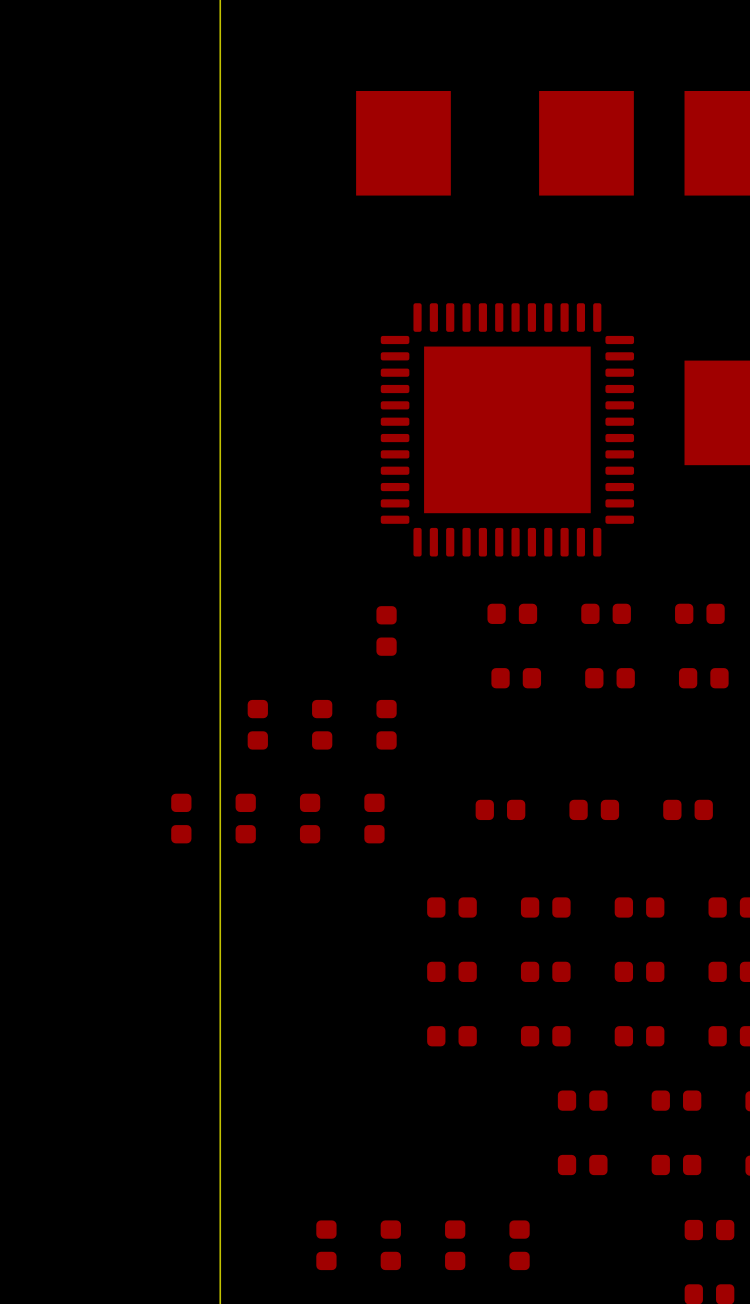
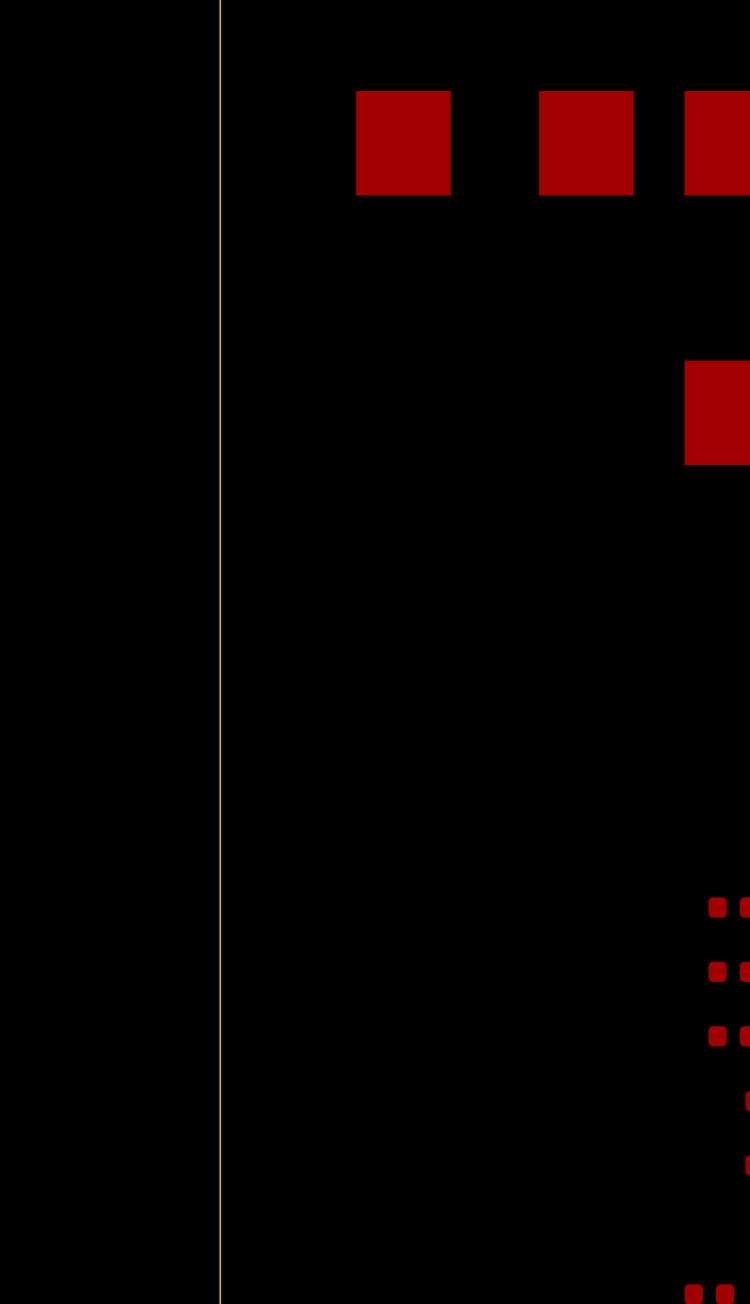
part: (507, 429) -> none
part: (512, 613) -> none
part: (606, 613) -> none
part: (699, 613) -> none
part: (386, 630) -> none
part: (516, 678) -> none
part: (610, 678) -> none
part: (703, 678) -> none
part: (257, 724) -> none
part: (322, 724) -> none
part: (386, 724) -> none
part: (500, 809) -> none
part: (594, 809) -> none
part: (688, 809) -> none
part: (181, 818) -> none
part: (245, 818) -> none
part: (310, 818) -> none
part: (374, 818) -> none
part: (451, 907) -> none
part: (545, 907) -> none
part: (639, 907) -> none
part: (451, 971) -> none
part: (545, 971) -> none
part: (639, 971) -> none
part: (451, 1036) -> none
part: (545, 1036) -> none
part: (639, 1036) -> none
part: (582, 1100) -> none
part: (676, 1100) -> none
part: (582, 1165) -> none
part: (676, 1165) -> none
part: (709, 1230) -> none
part: (326, 1245) -> none
part: (390, 1245) -> none
part: (455, 1245) -> none
part: (519, 1245) -> none

